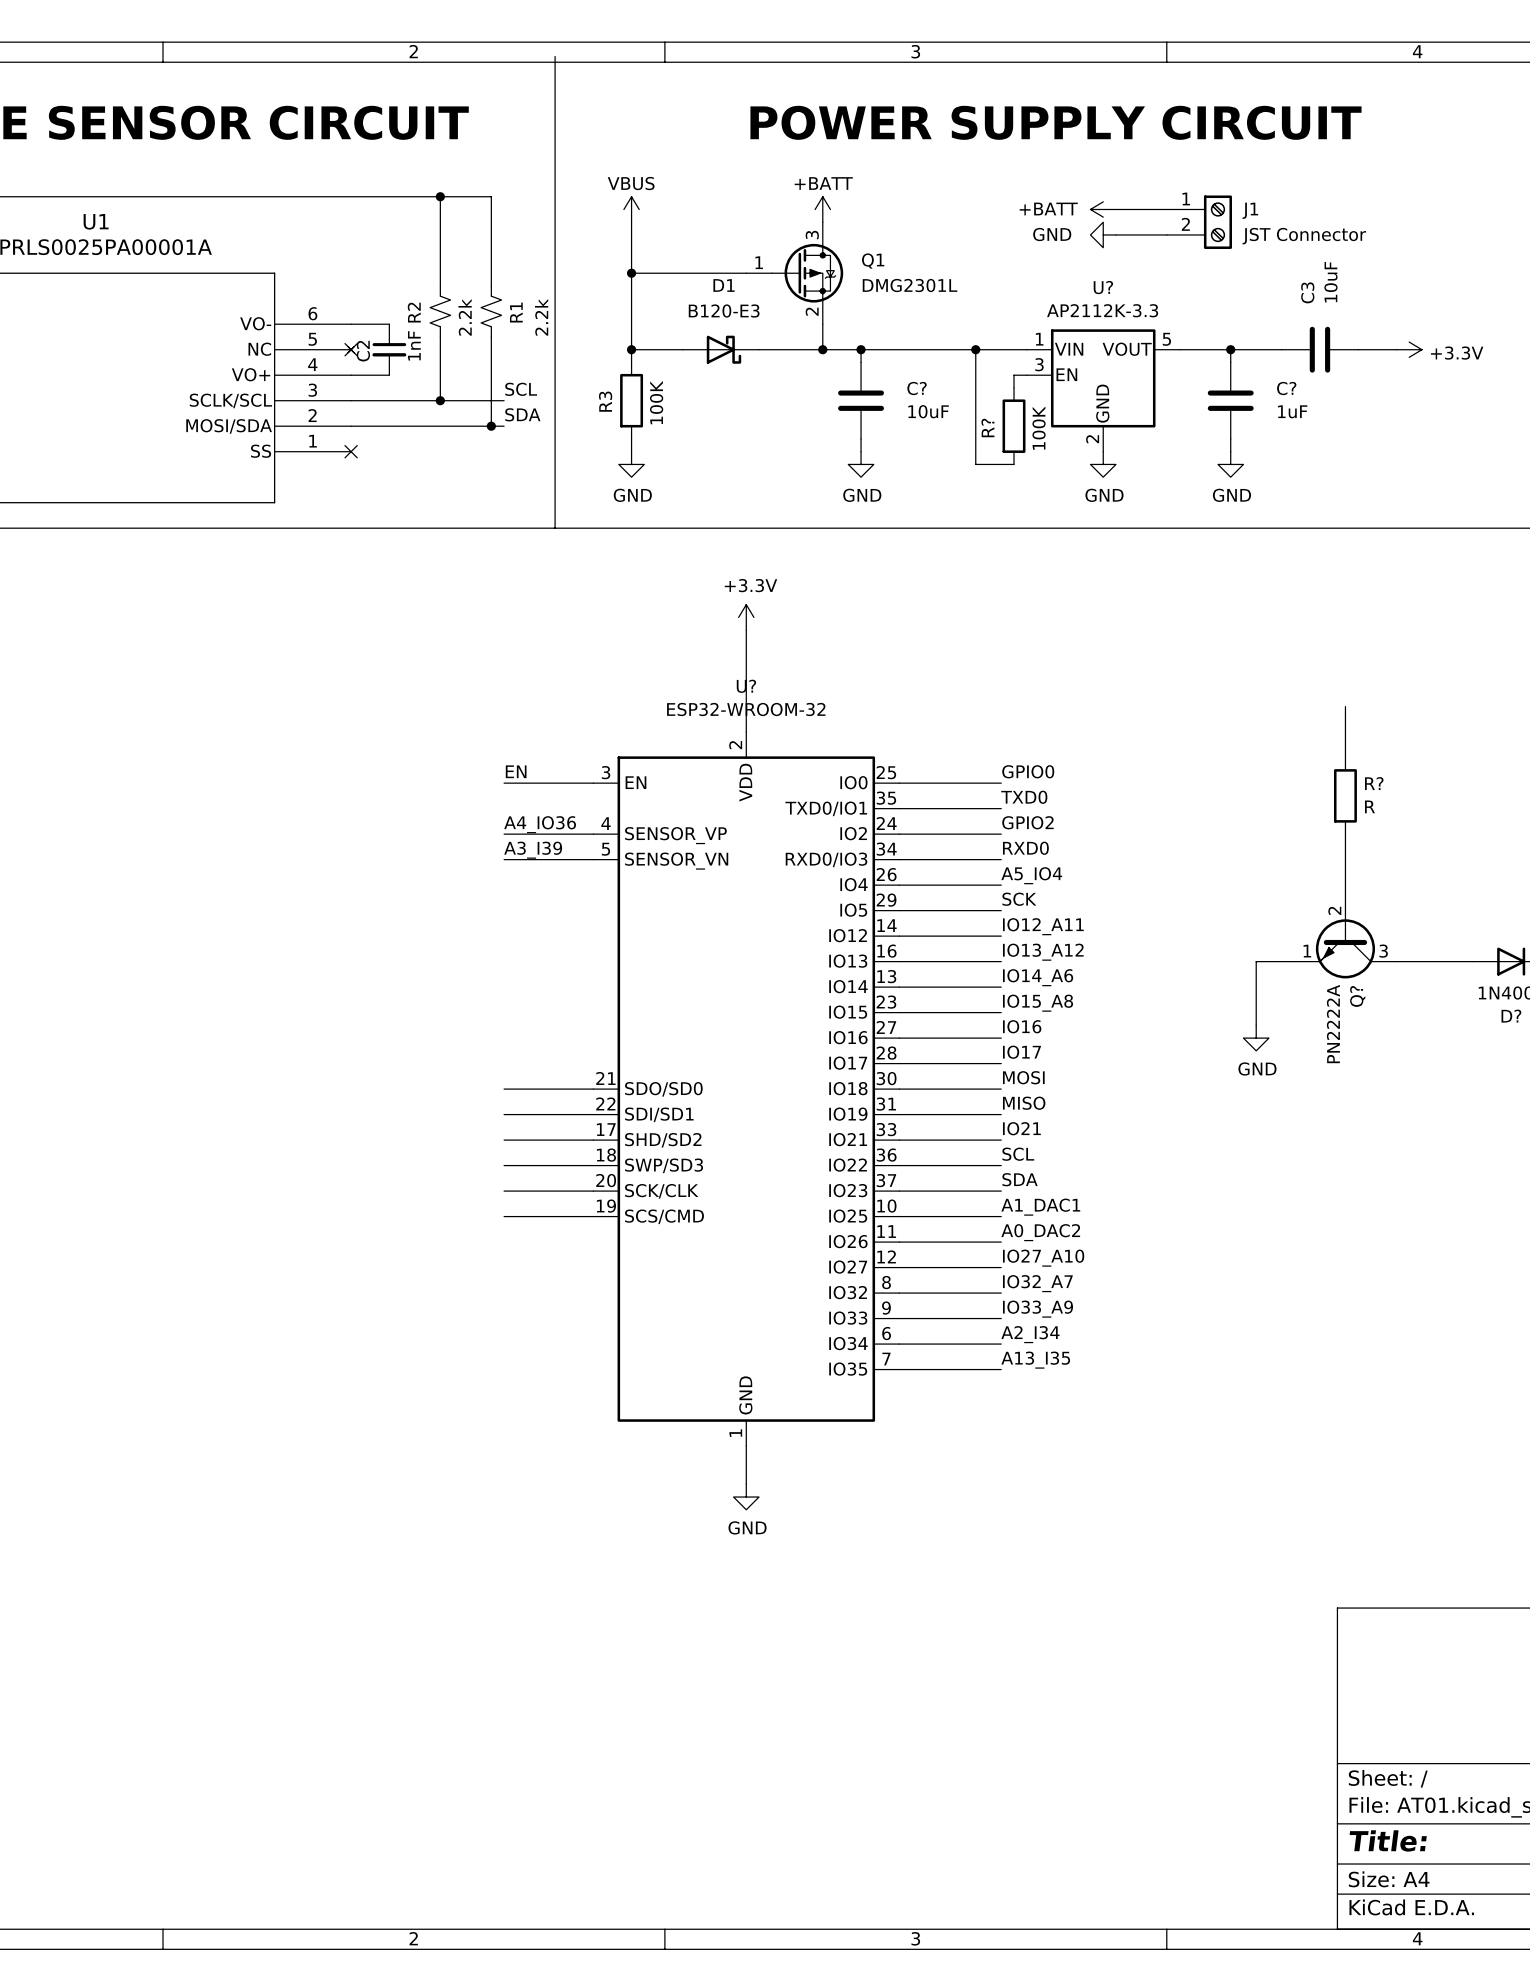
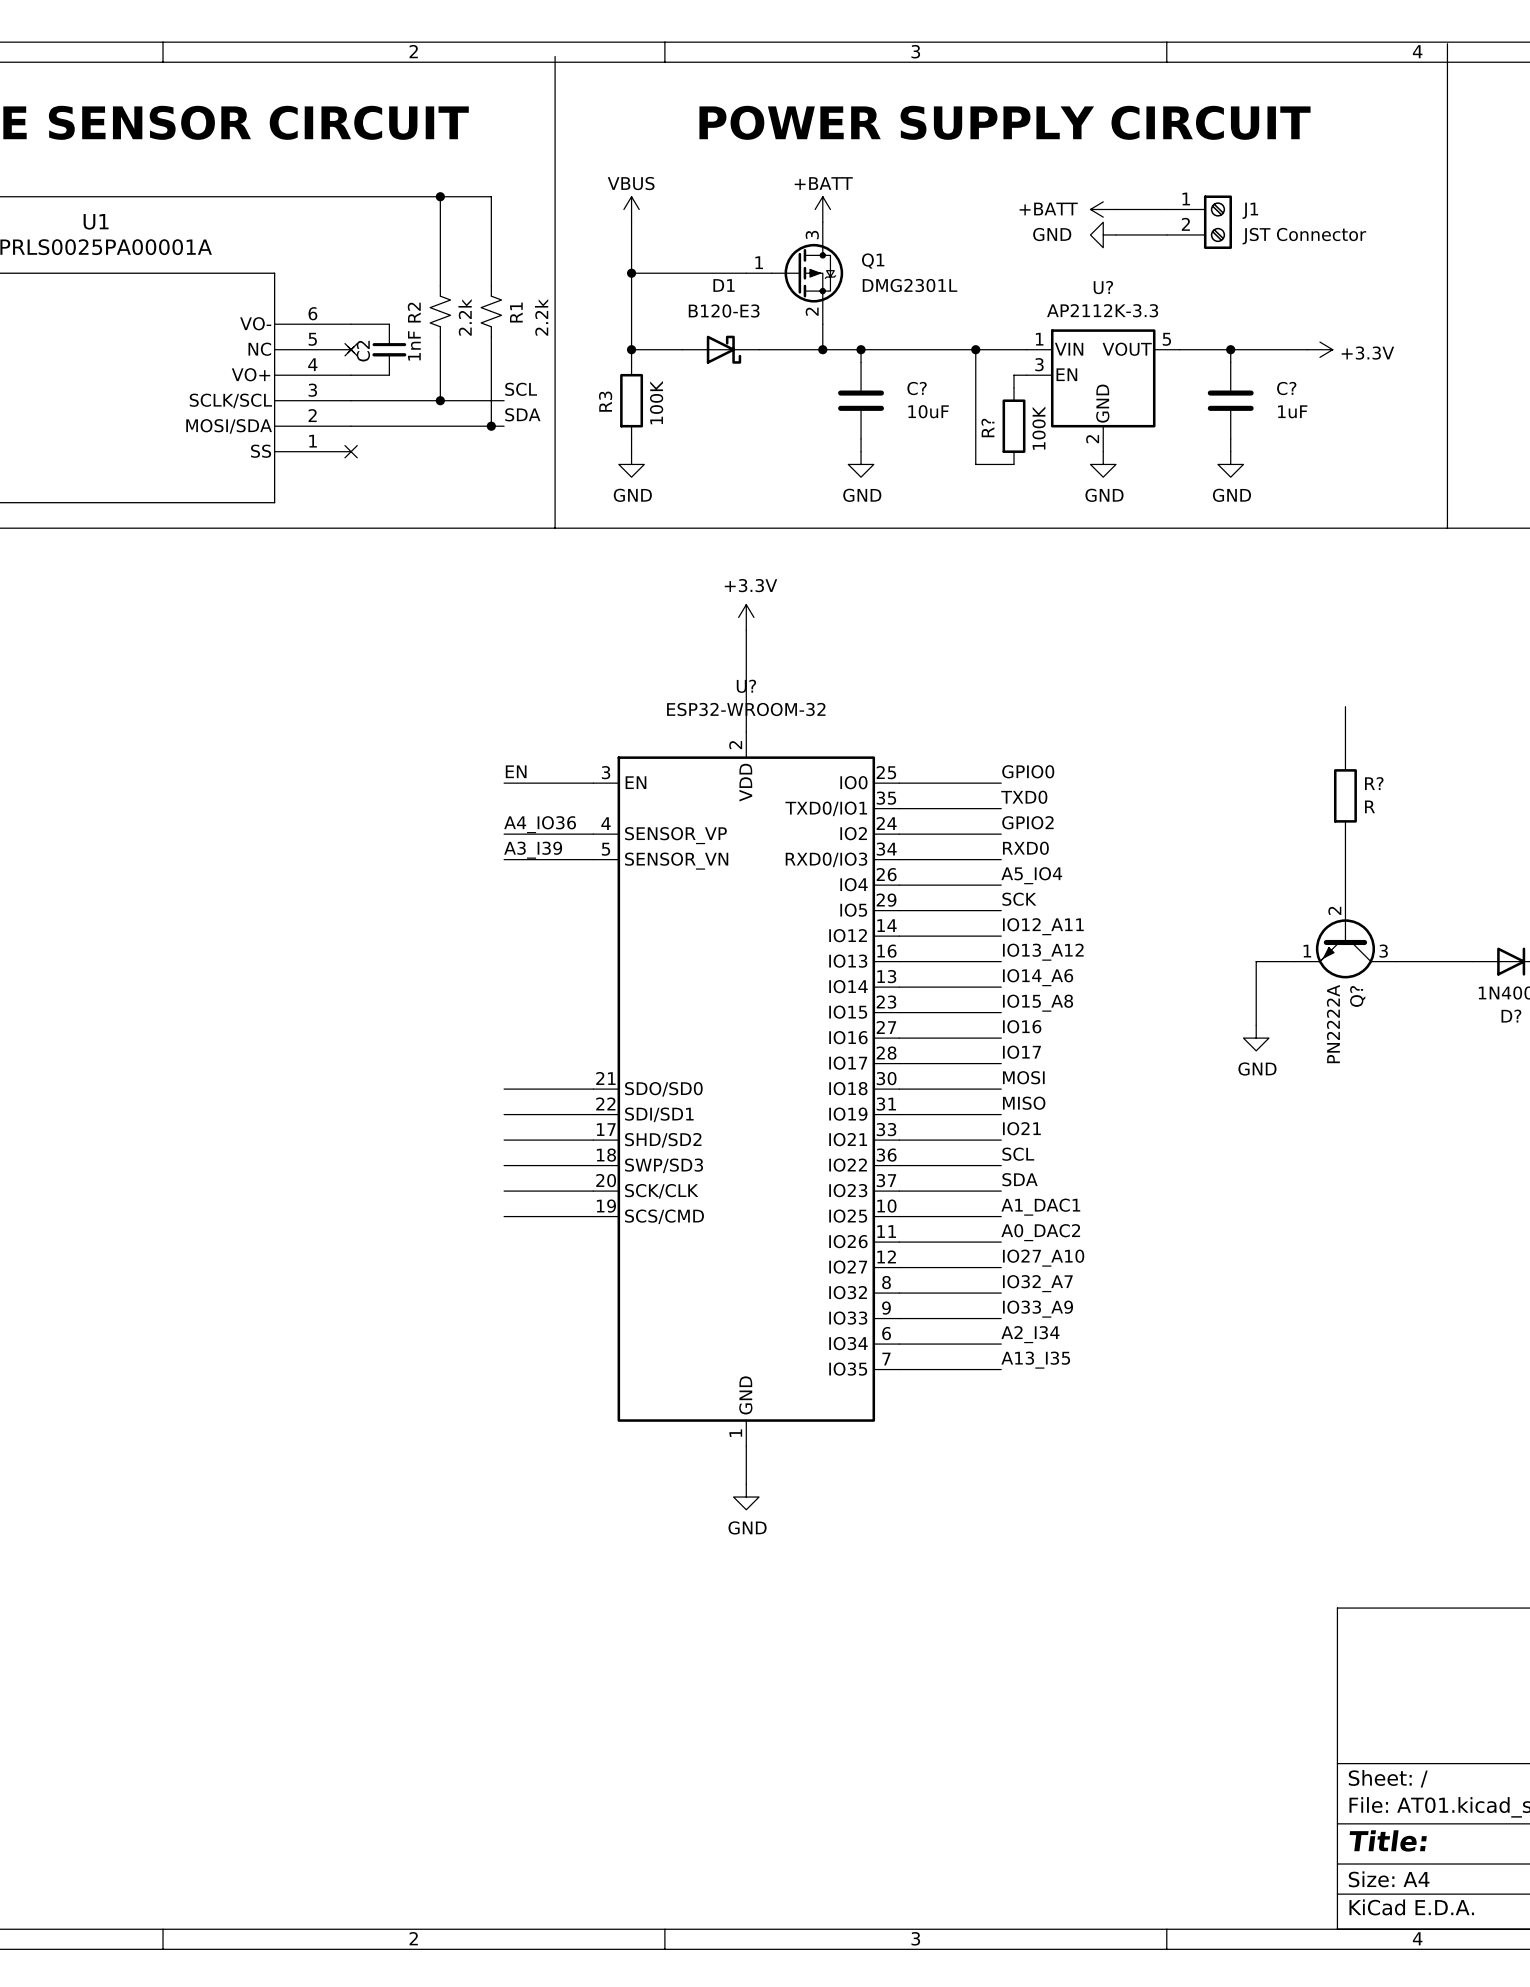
line: none -> (1447, 43) (1447, 528)
text position: POWER SUPPLY CIRCUIT (1055, 122) -> POWER SUPPLY CIRCUIT (1004, 122)
C3: 10uF (1319, 349) -> none
wire: (1358, 349) (1396, 349) -> none
power symbol position: +3.3V (1409, 349) -> +3.3V (1319, 349)

